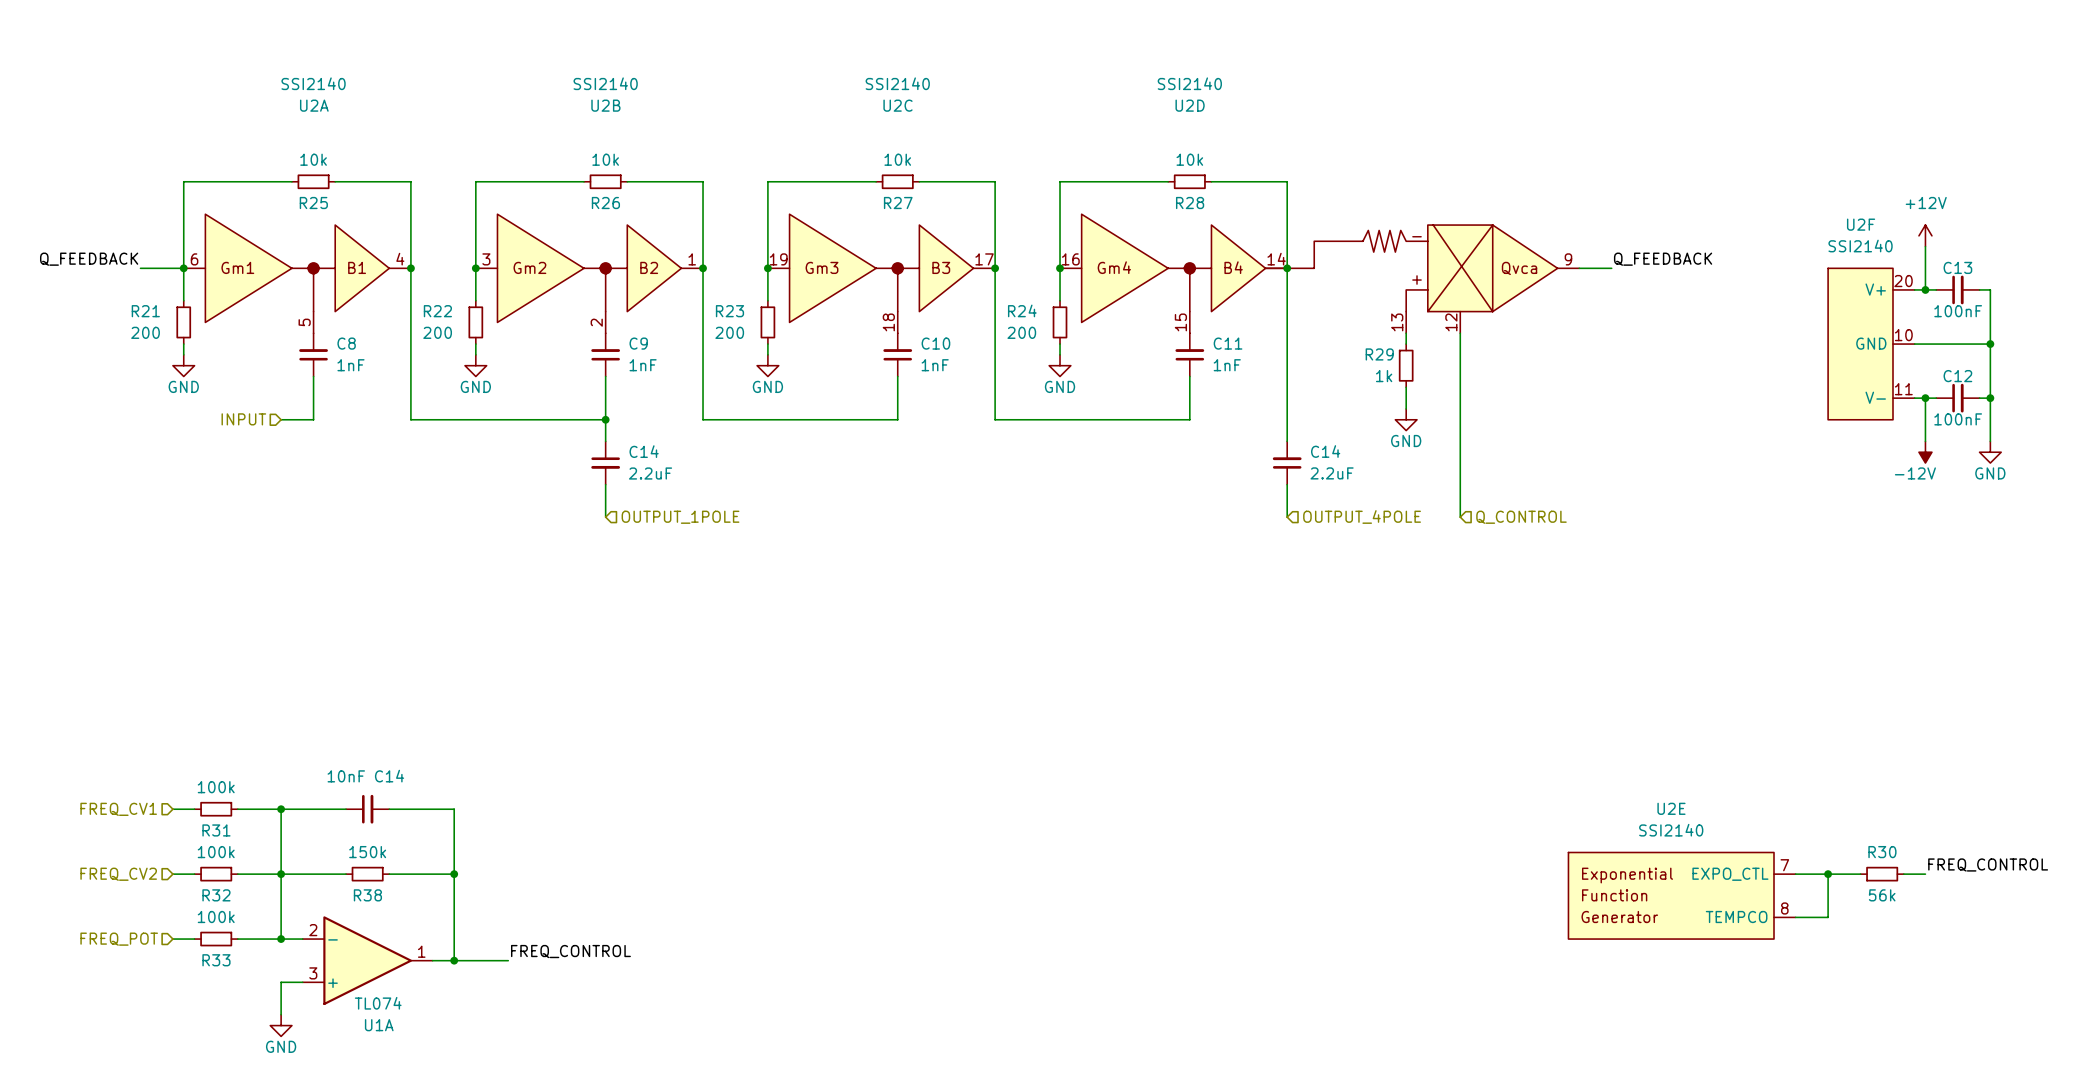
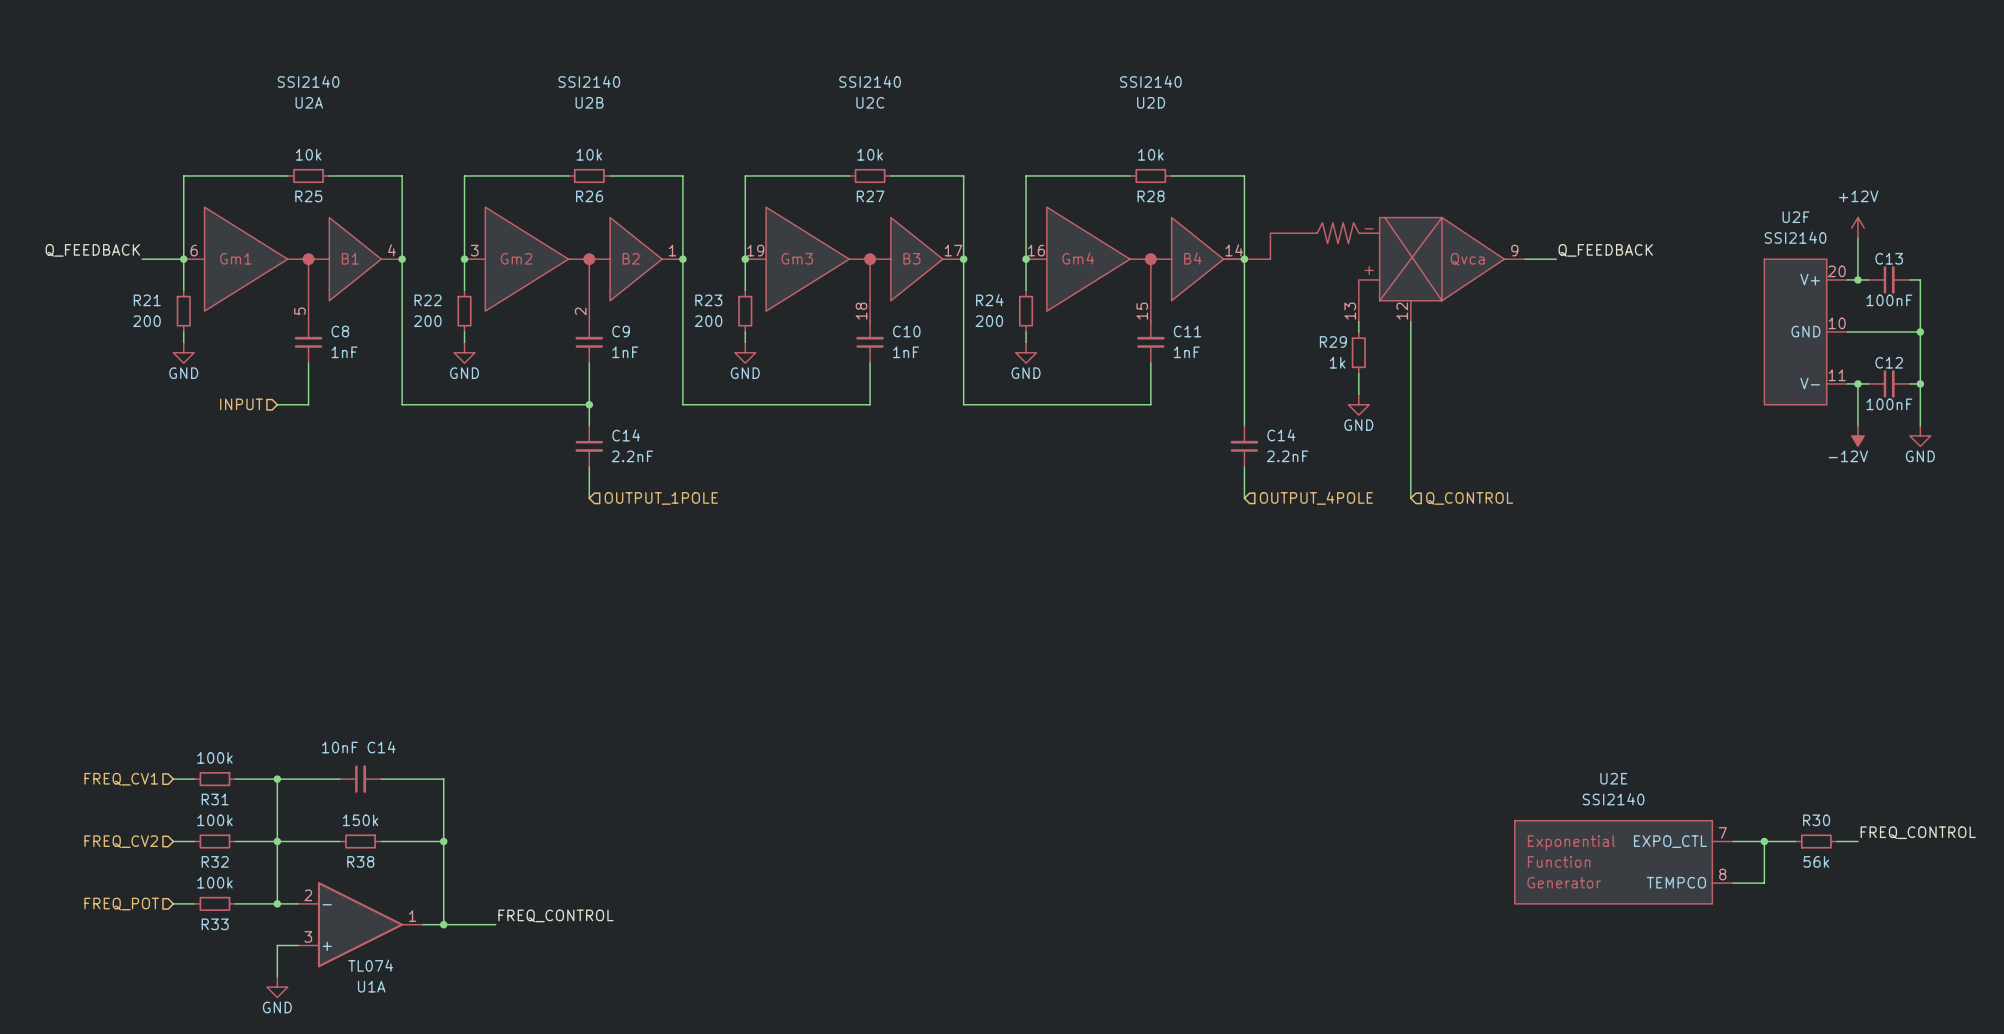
C14 value: 2.2uF (650, 473) -> 2.2nF (632, 456)
C14 value: 2.2uF (1332, 473) -> 2.2nF (1287, 456)

